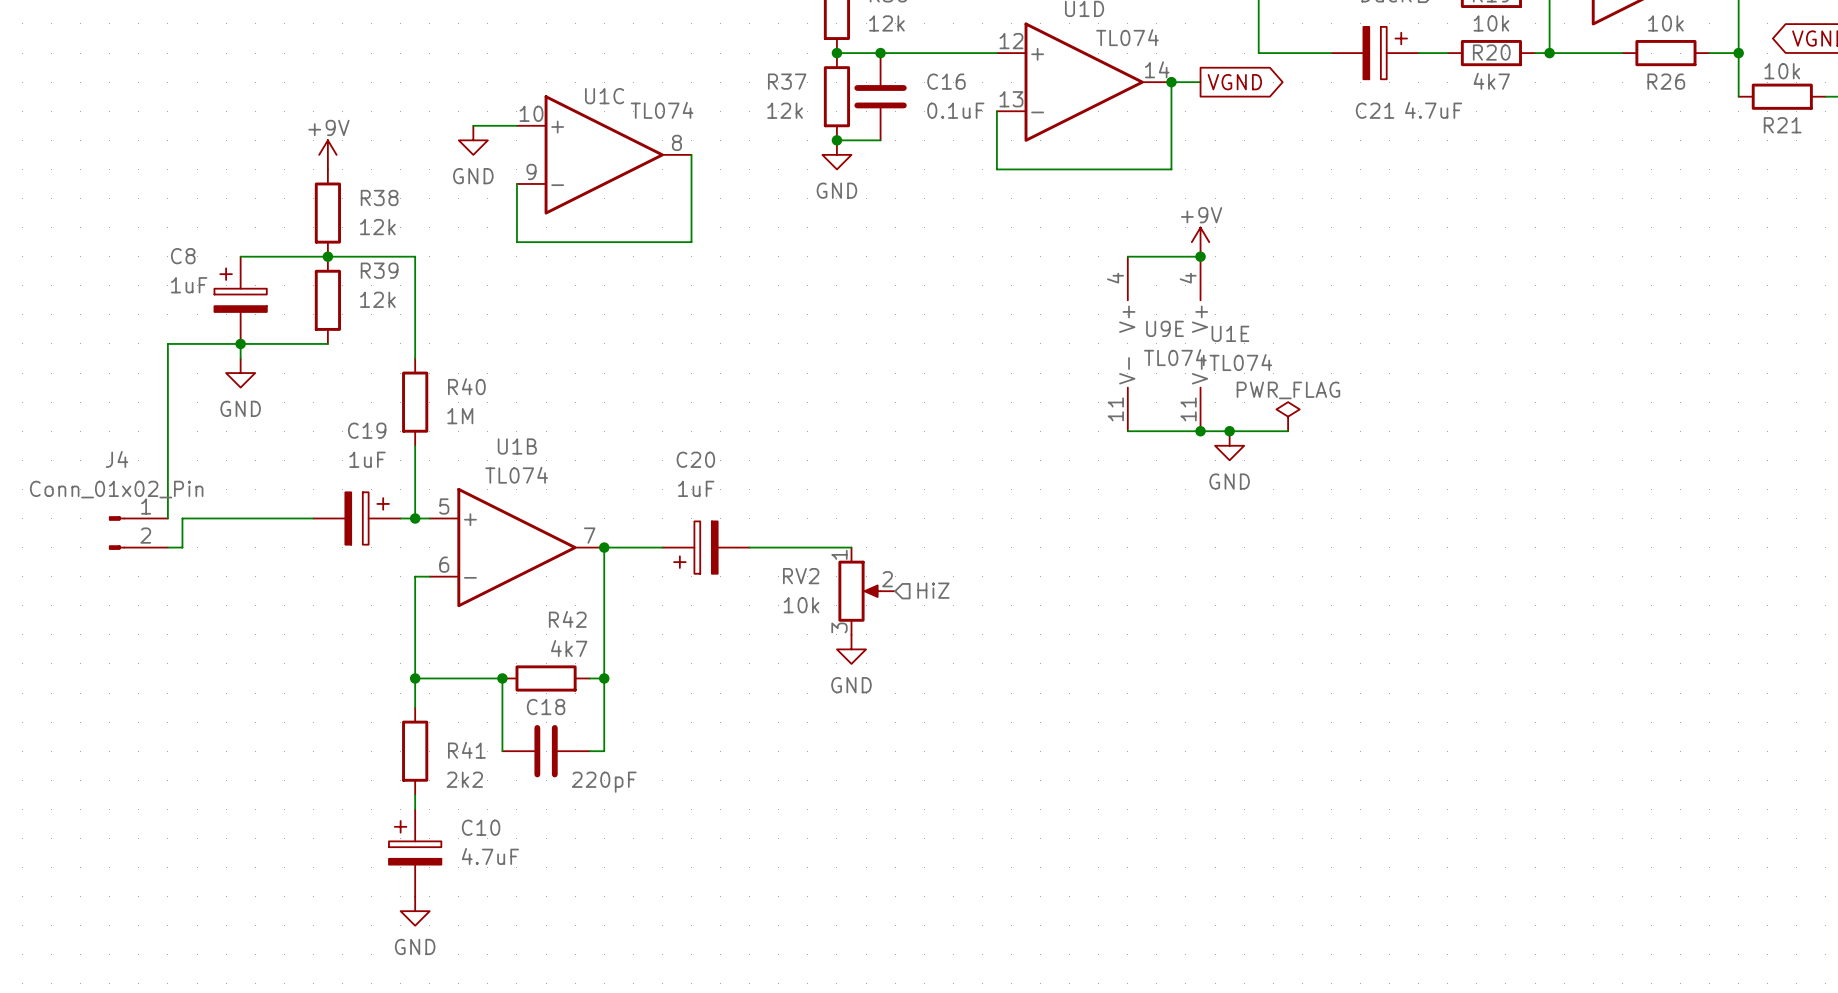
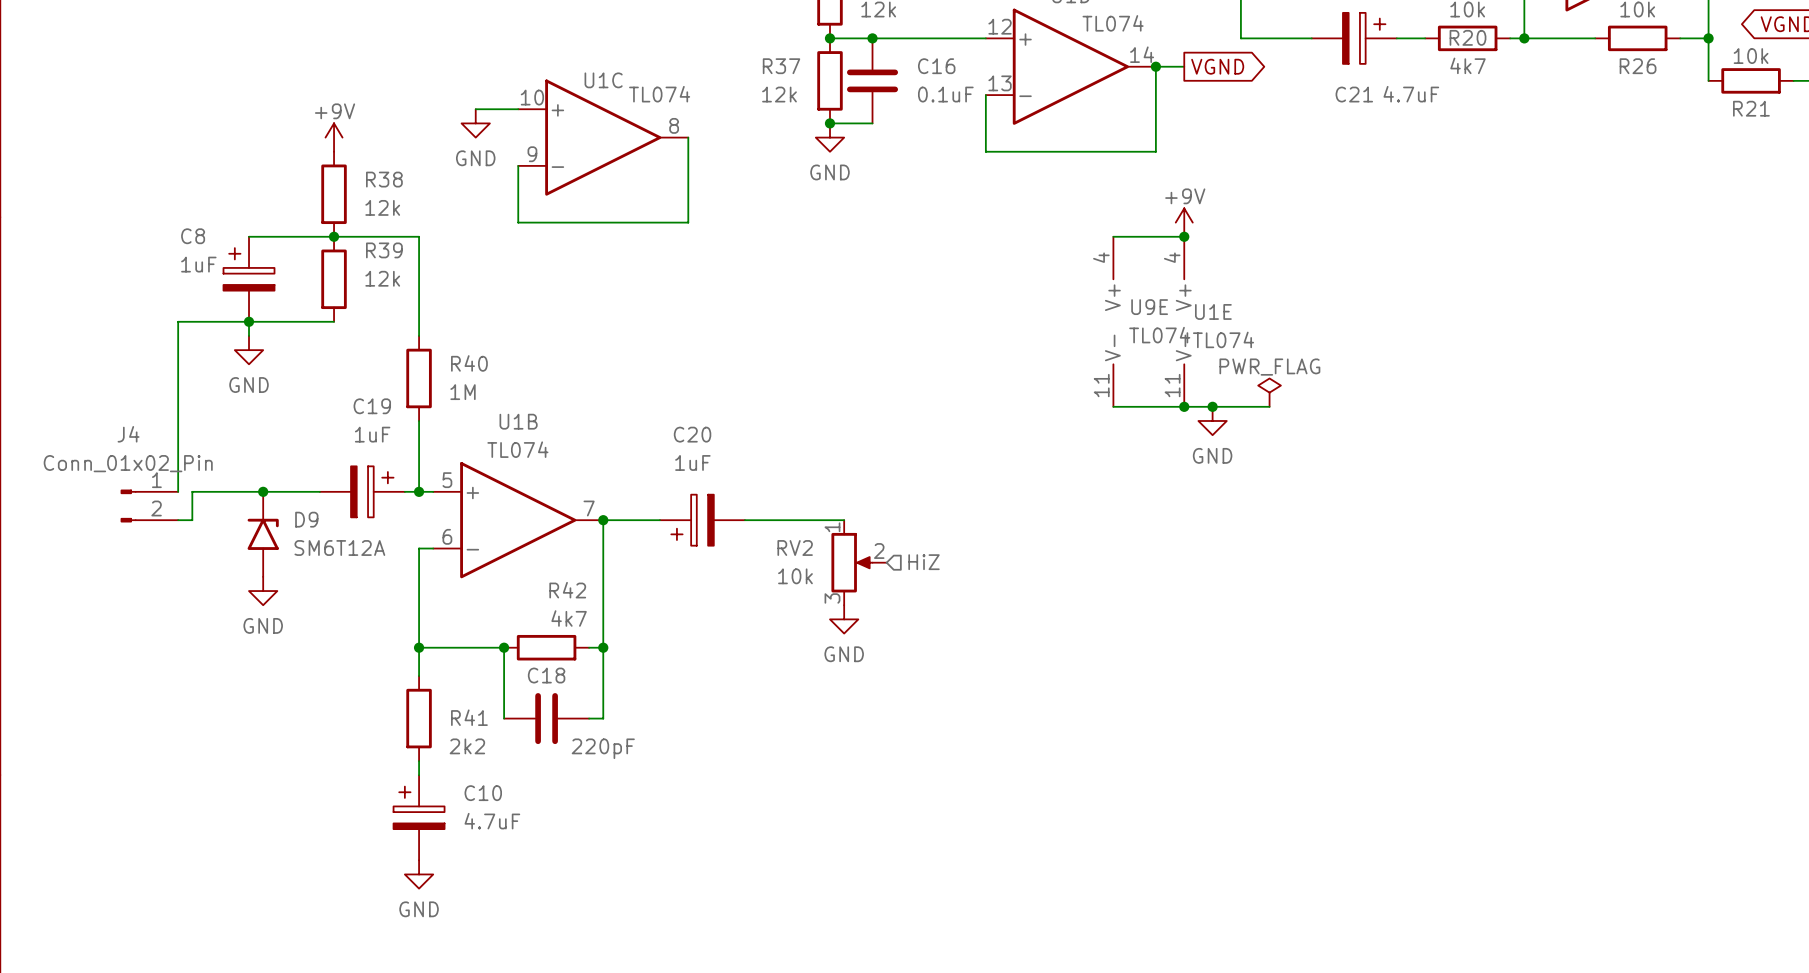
junction: none -> (263, 491)
D9: none -> SM6T12A (263, 534)
power symbol: none -> GND (263, 591)

